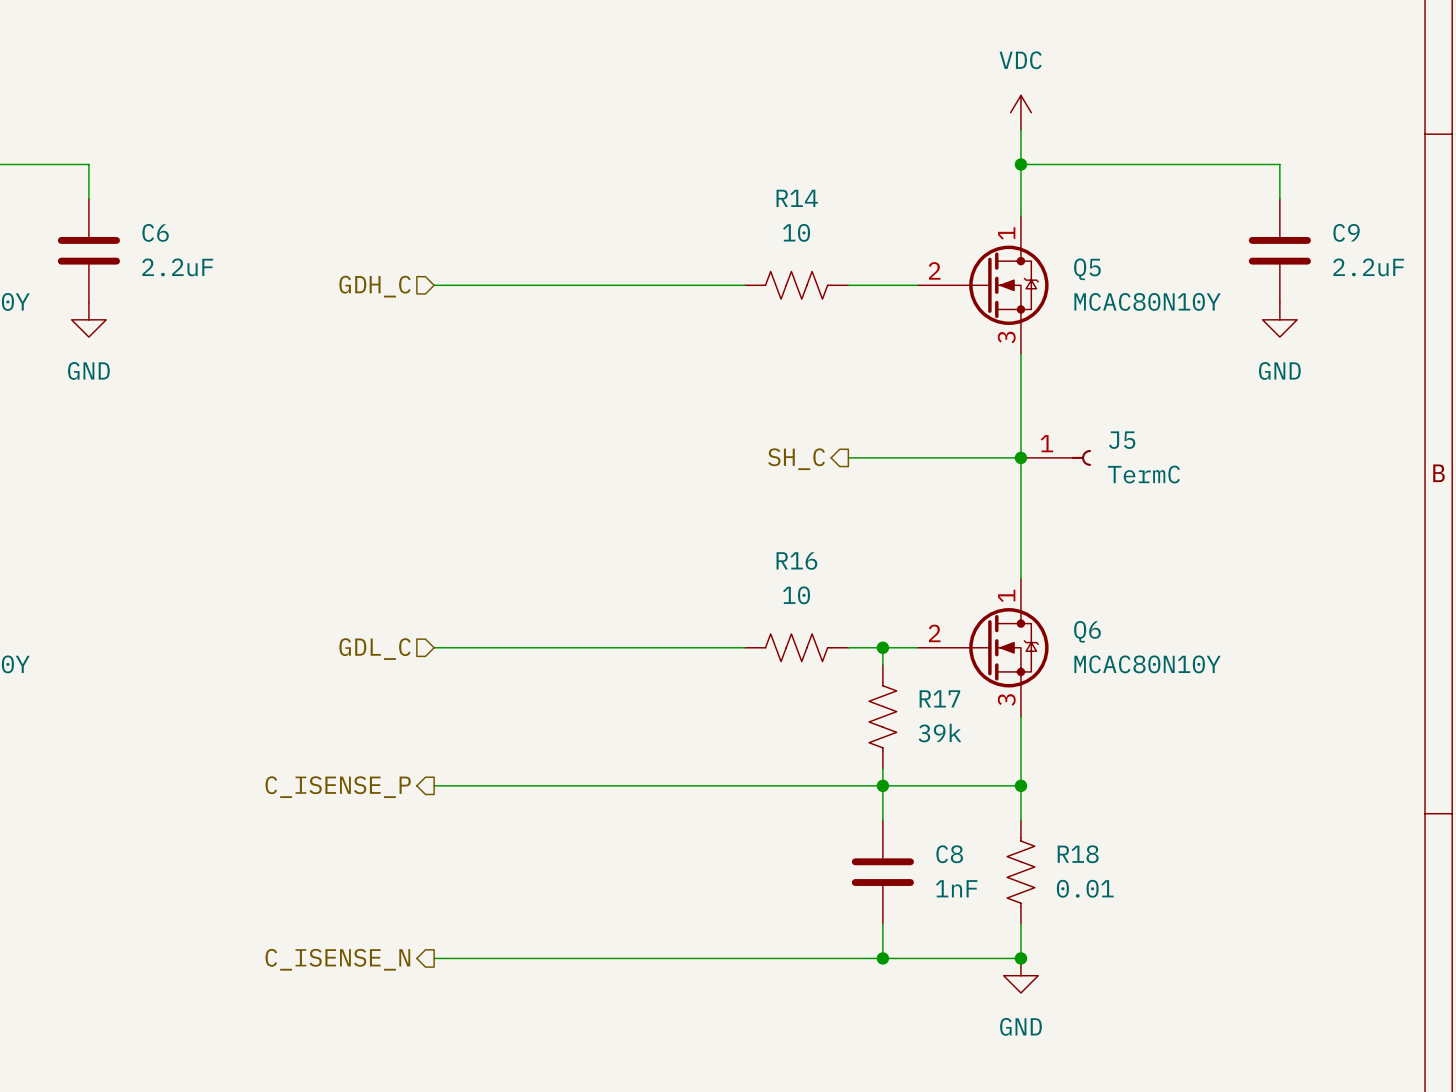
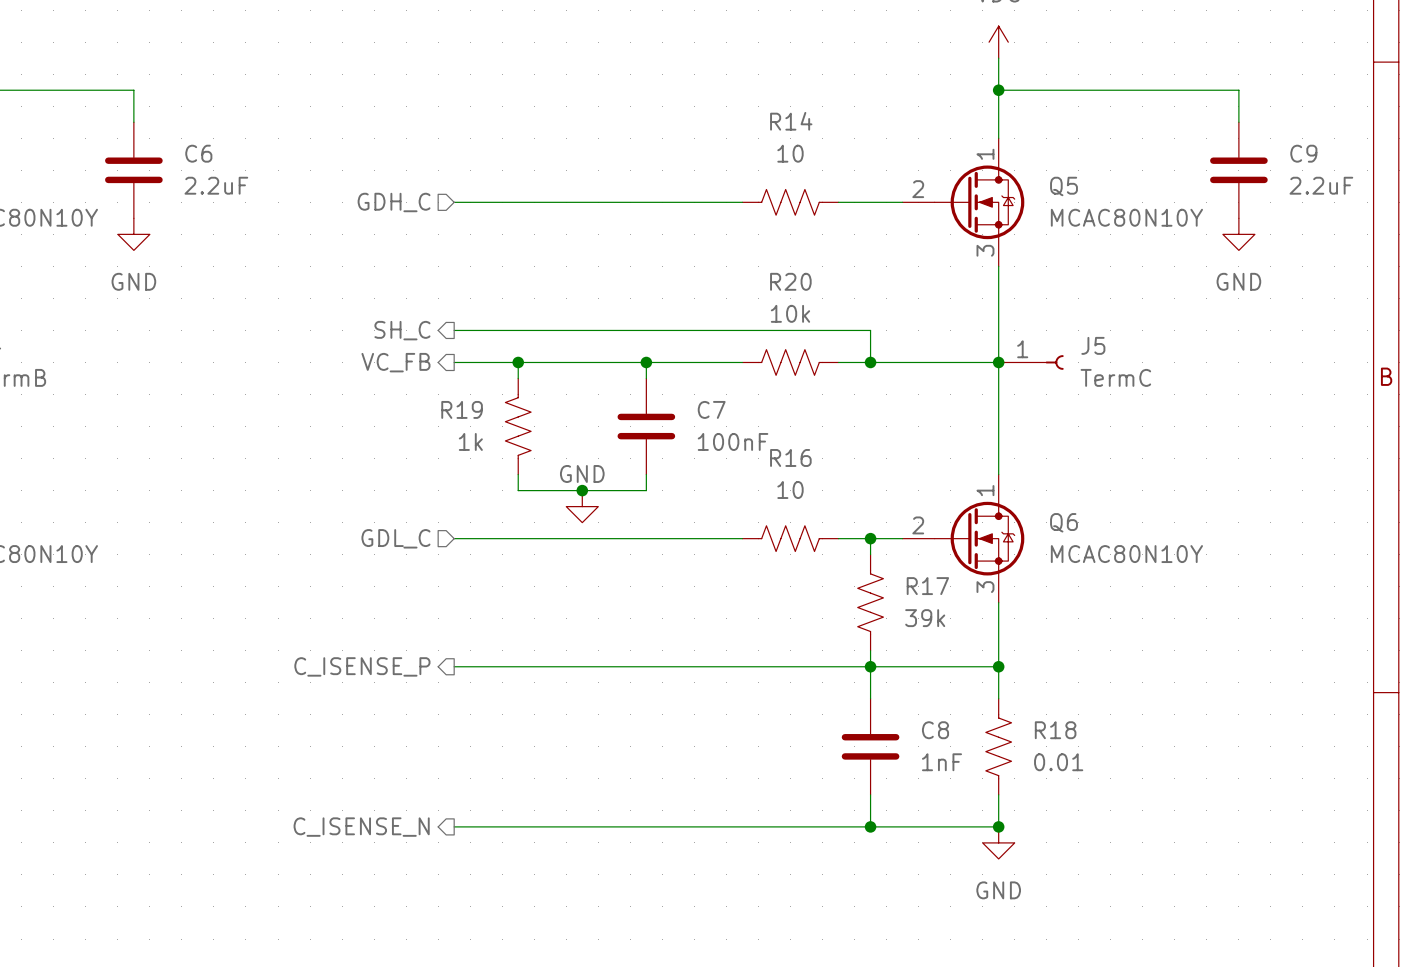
wire: none -> (454, 330) (870, 330) (870, 362)
hierarchical label: none -> SH_C (402, 330)
wire: none -> (454, 362) (742, 362)
wire: none -> (518, 362) (518, 378)
junction: none -> (518, 362)
wire: none -> (646, 362) (646, 378)
junction: none -> (646, 362)
R20: none -> 10k (790, 362)
junction: none -> (870, 362)
hierarchical label: none -> VC_FB (395, 362)
hierarchical label: SH_C (796, 459) -> none
R19: none -> 1k (518, 426)
C7: none -> 100nF (646, 426)
wire: none -> (518, 474) (518, 490) (646, 490) (646, 474)
junction: none -> (582, 490)
power symbol: none -> GND (582, 506)

